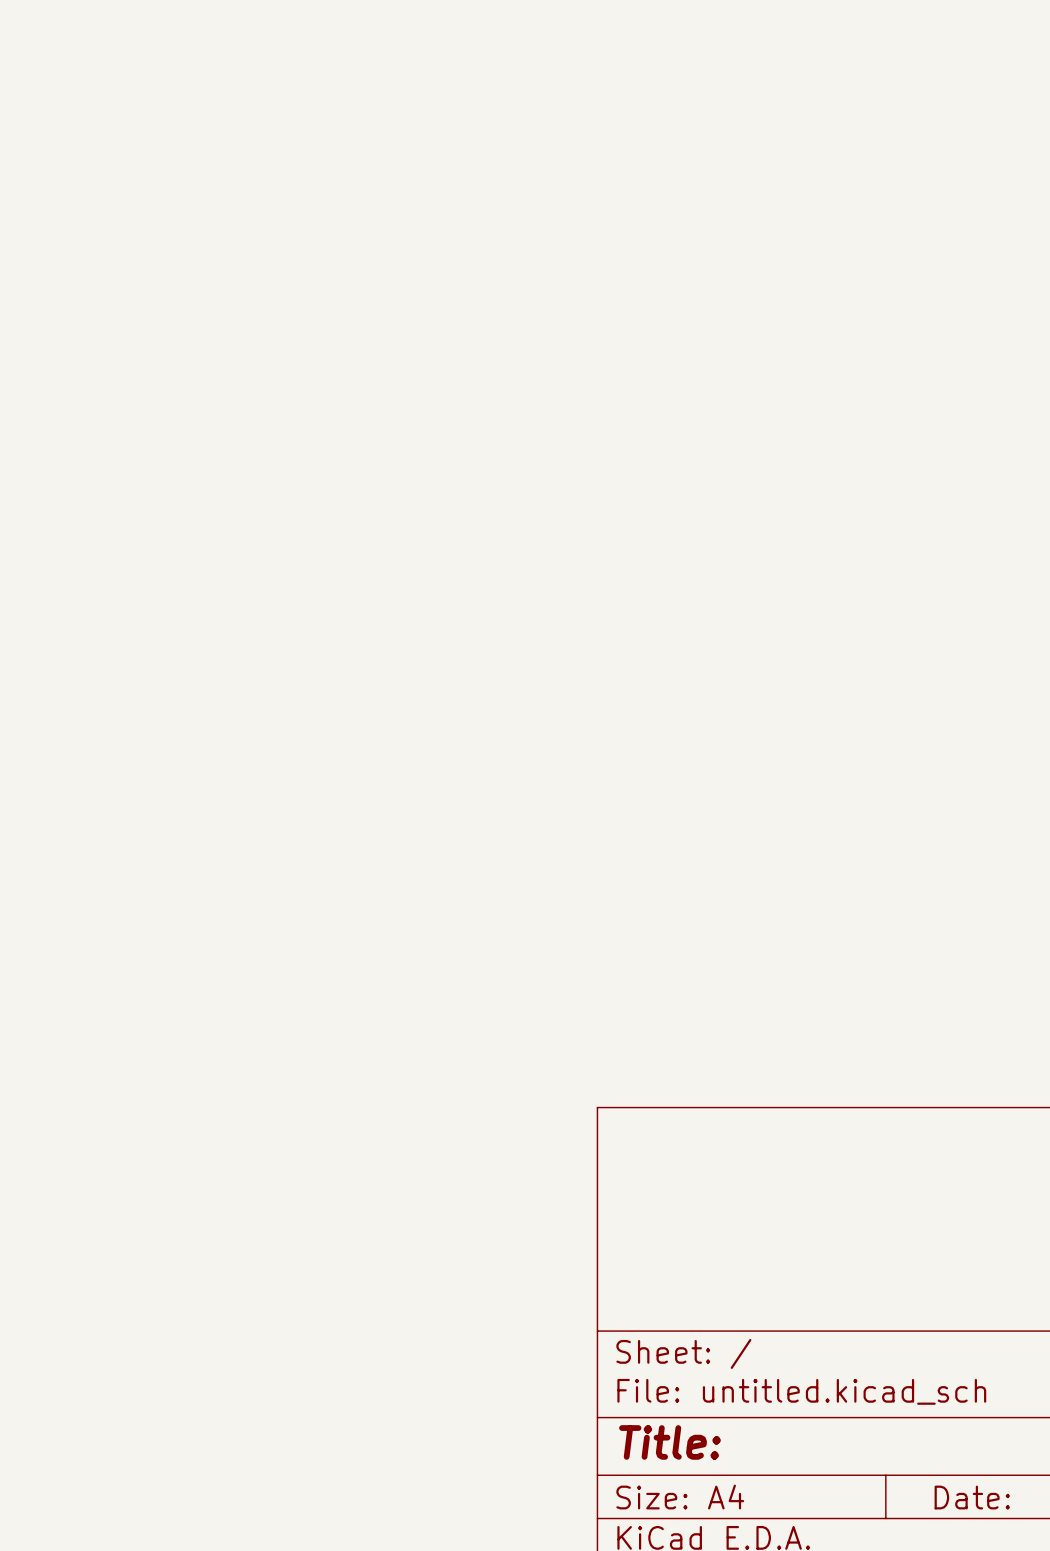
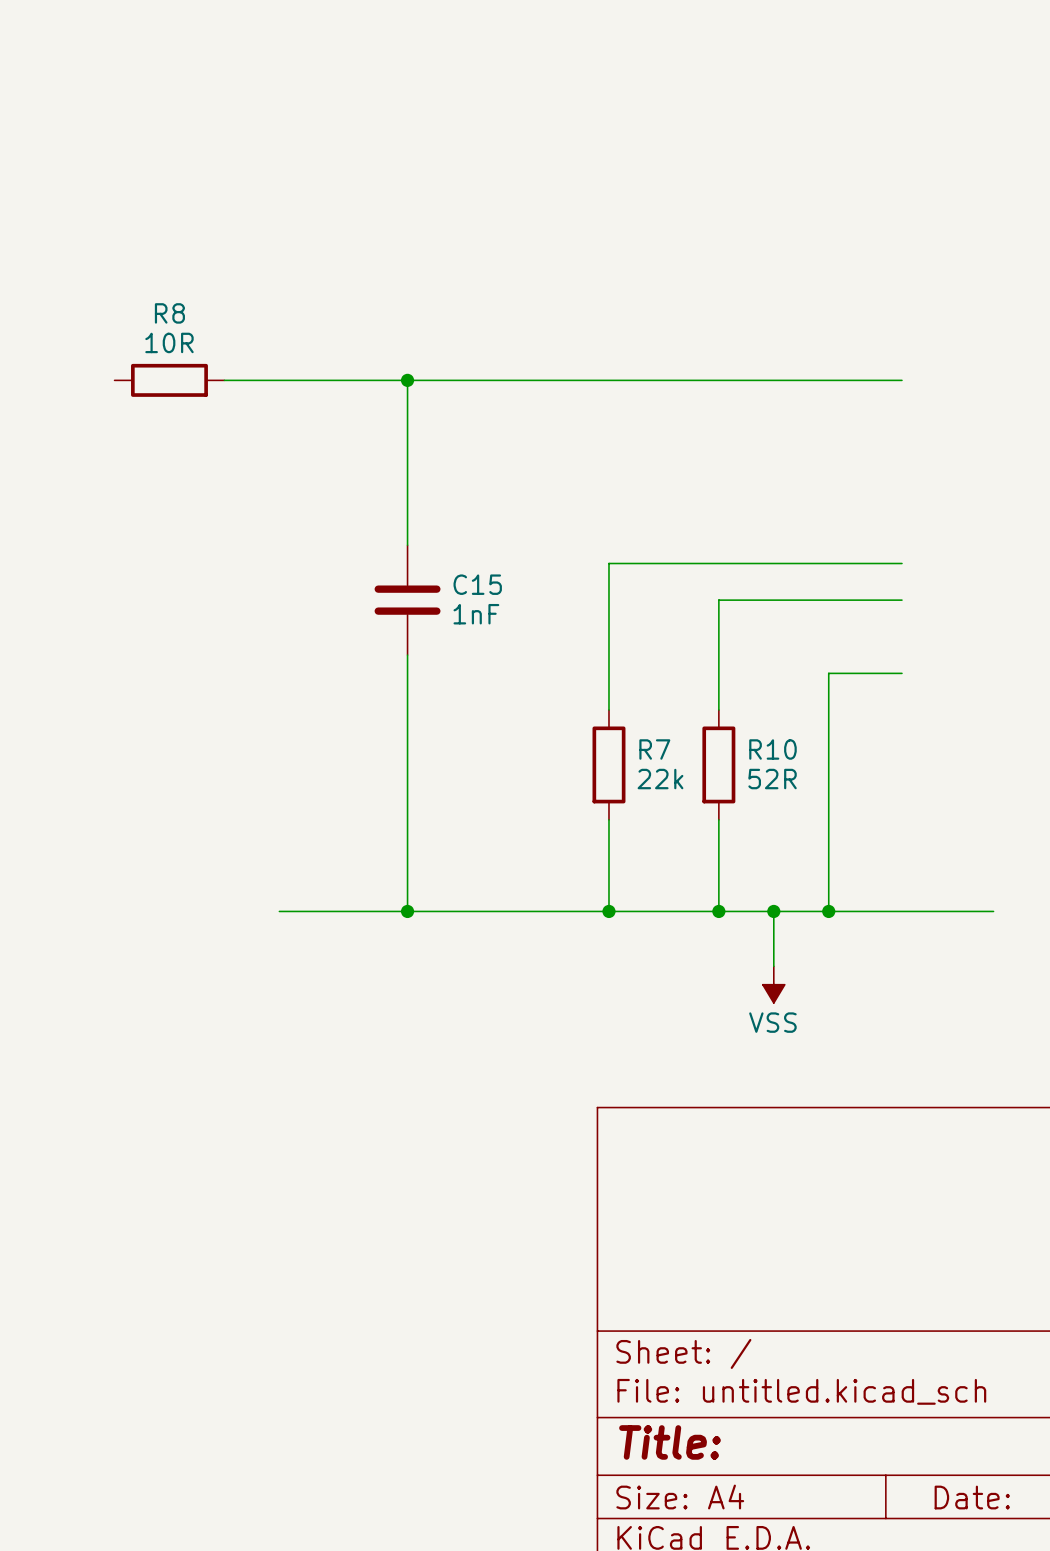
R8: none -> 10R (169, 380)
wire: none -> (224, 380) (901, 380)
wire: none -> (407, 380) (407, 545)
junction: none -> (407, 380)
wire: none -> (901, 563) (608, 563) (608, 710)
C15: none -> 1nF (407, 600)
wire: none -> (901, 600) (718, 600) (718, 710)
wire: none -> (407, 655) (407, 911)
wire: none -> (901, 673) (828, 673) (828, 911)
R7: none -> 22k (608, 764)
R10: none -> 52R (718, 764)
wire: none -> (608, 819) (608, 911)
wire: none -> (718, 819) (718, 911)
wire: none -> (279, 911) (993, 911)
junction: none -> (407, 911)
junction: none -> (608, 911)
junction: none -> (718, 911)
wire: none -> (773, 911) (773, 966)
junction: none -> (773, 911)
junction: none -> (828, 911)
power symbol: none -> VSS (773, 984)

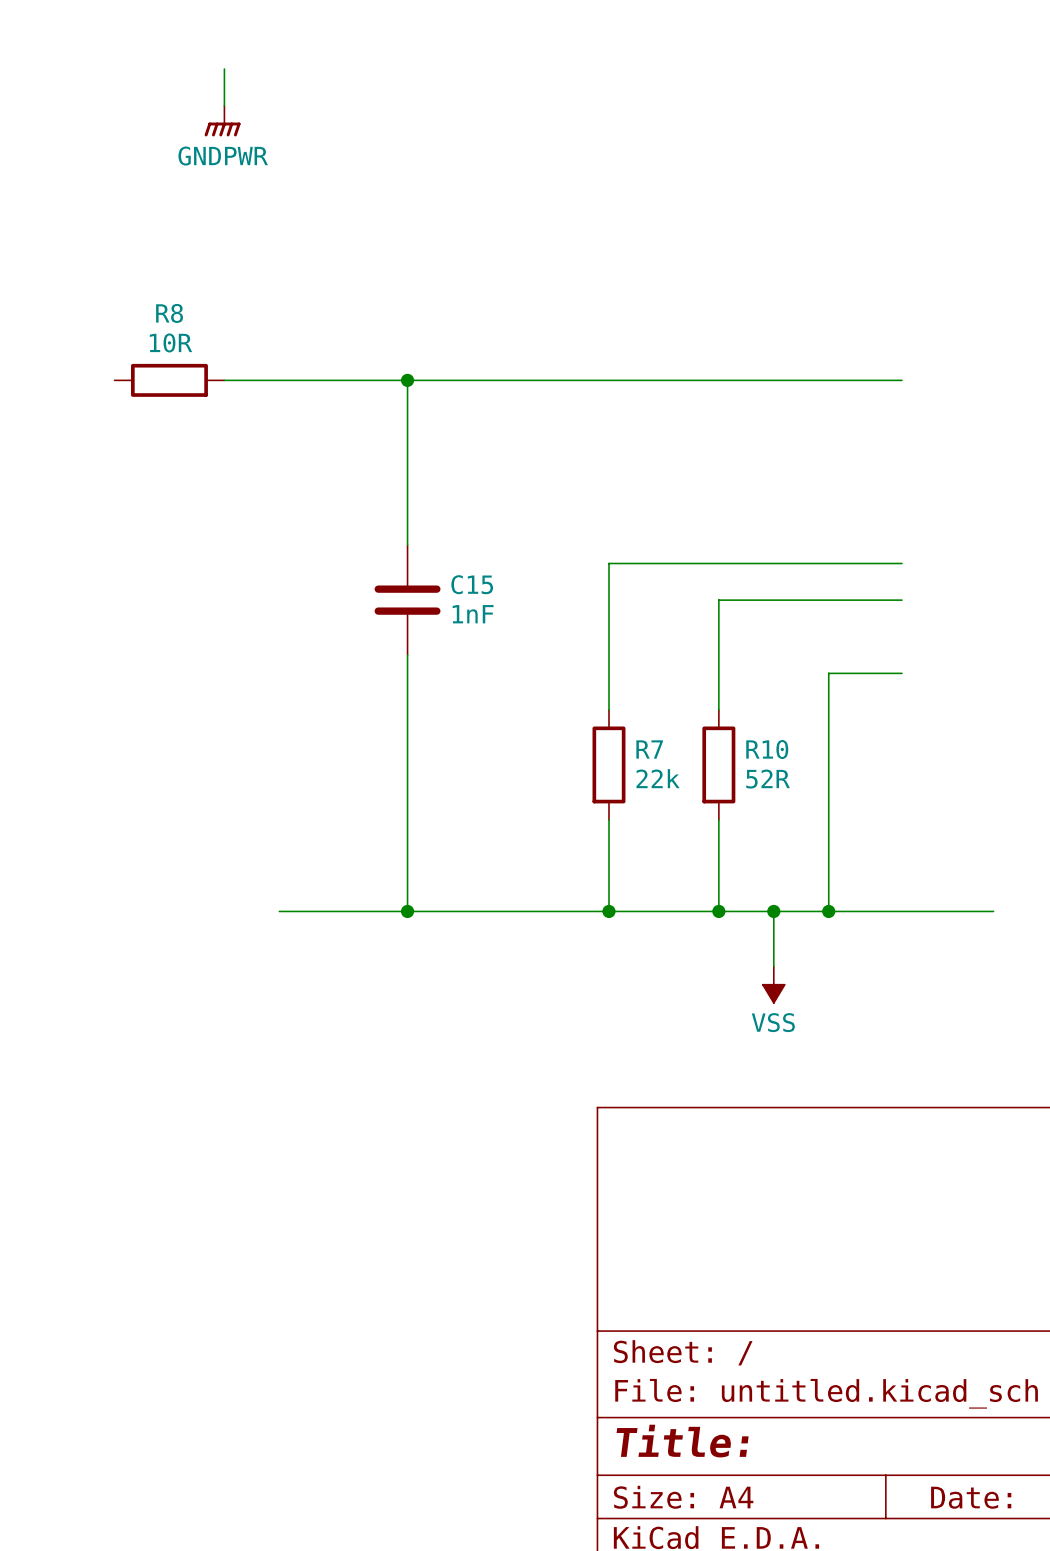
wire: none -> (224, 69) (224, 105)
power symbol: none -> GNDPWR (222, 121)

